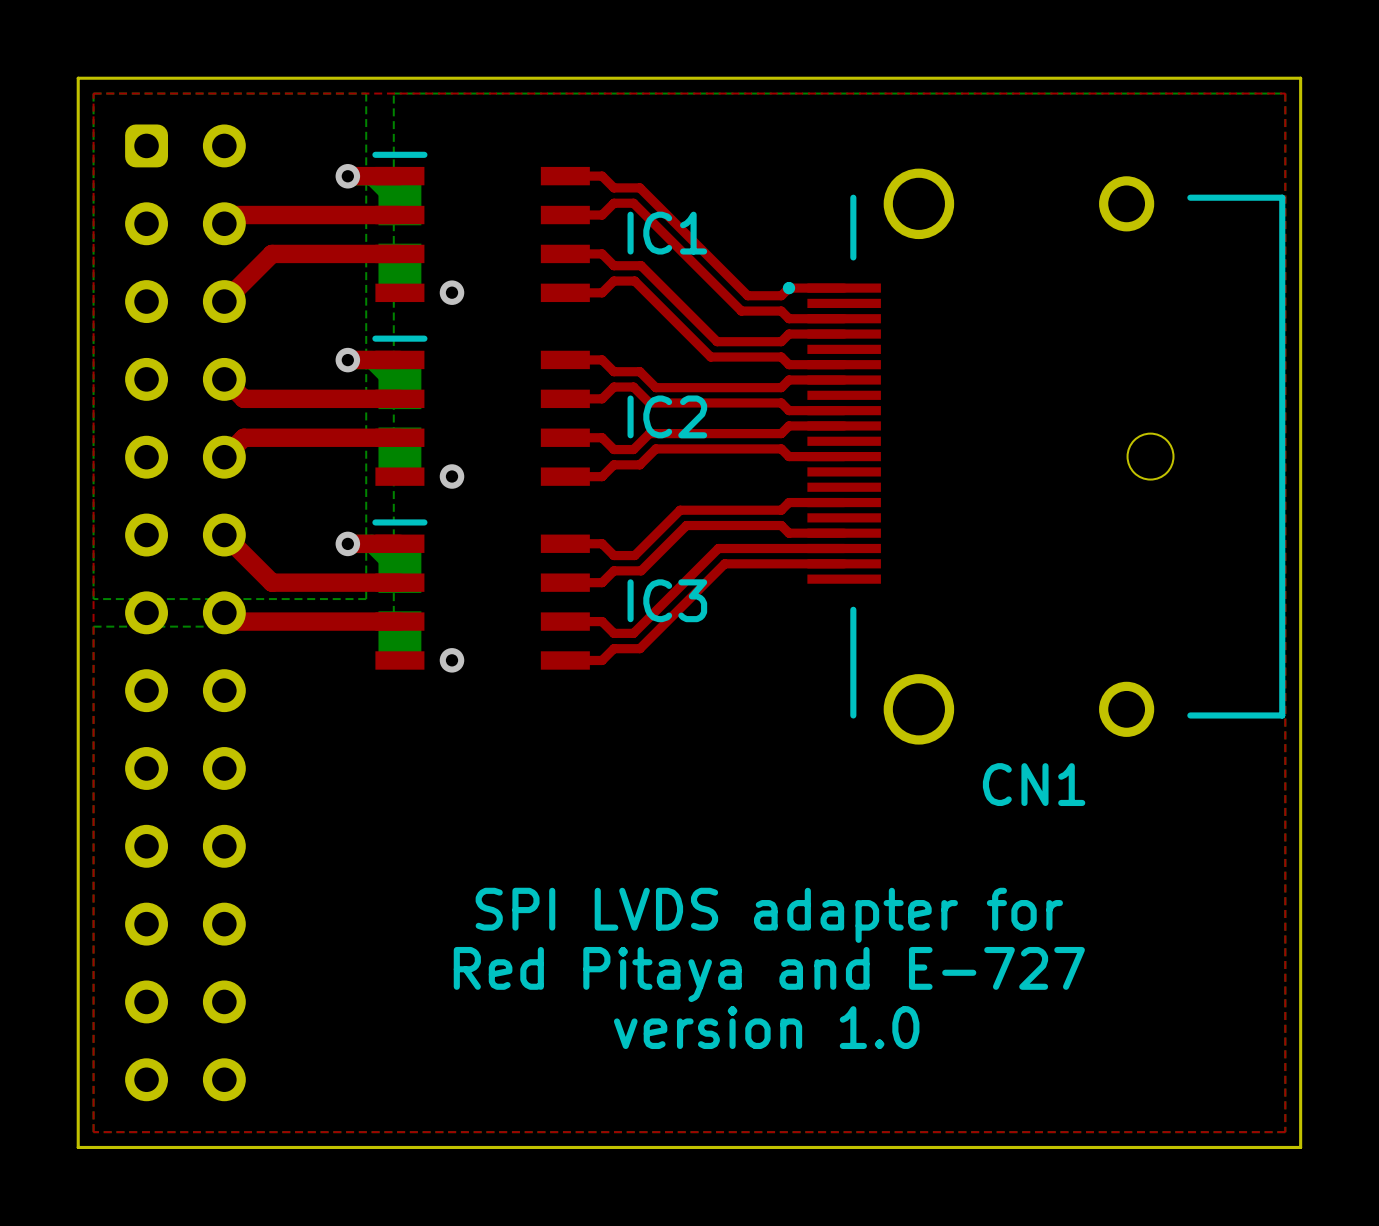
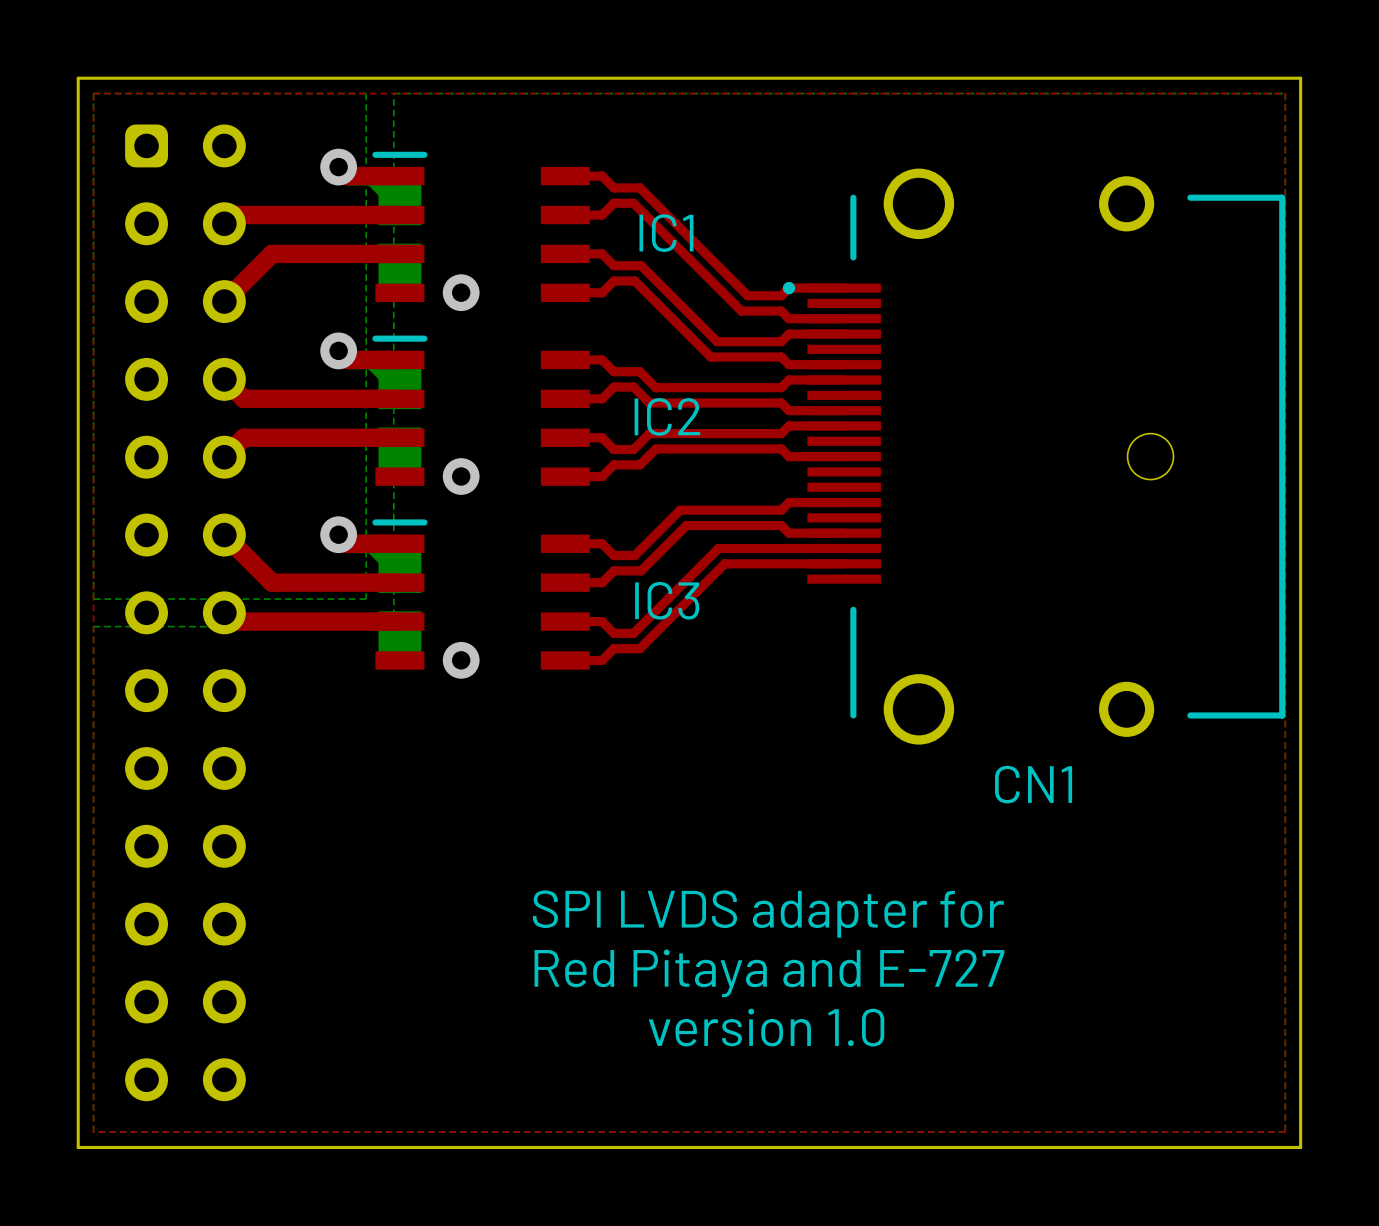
via size: [335, 164, 361, 189] -> [320, 148, 358, 186]
via size: [439, 280, 465, 305] -> [442, 274, 480, 312]
via size: [335, 347, 361, 373] -> [320, 332, 358, 370]
via size: [439, 464, 465, 489] -> [442, 458, 480, 495]
via size: [335, 531, 361, 557] -> [320, 516, 358, 554]
via size: [439, 648, 465, 673] -> [442, 641, 480, 679]

